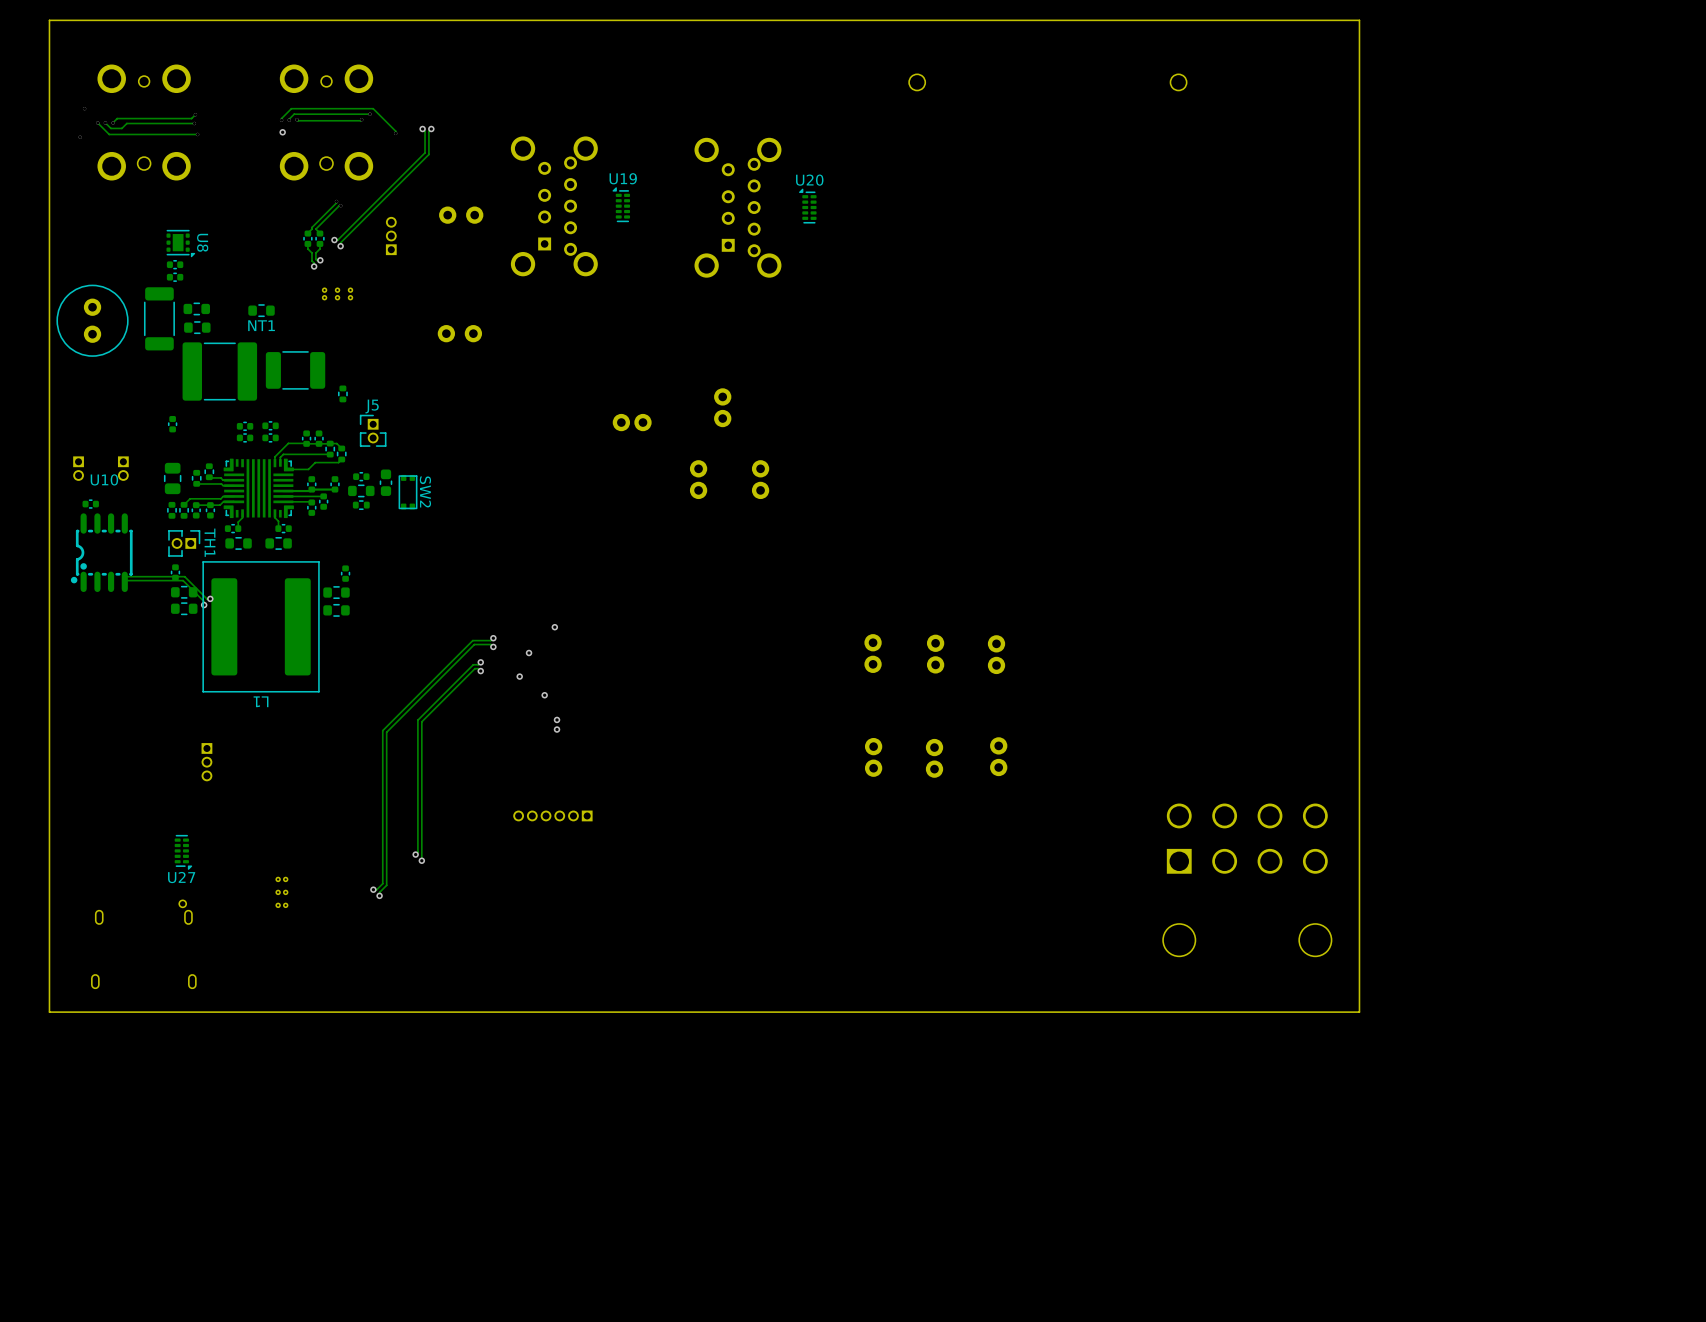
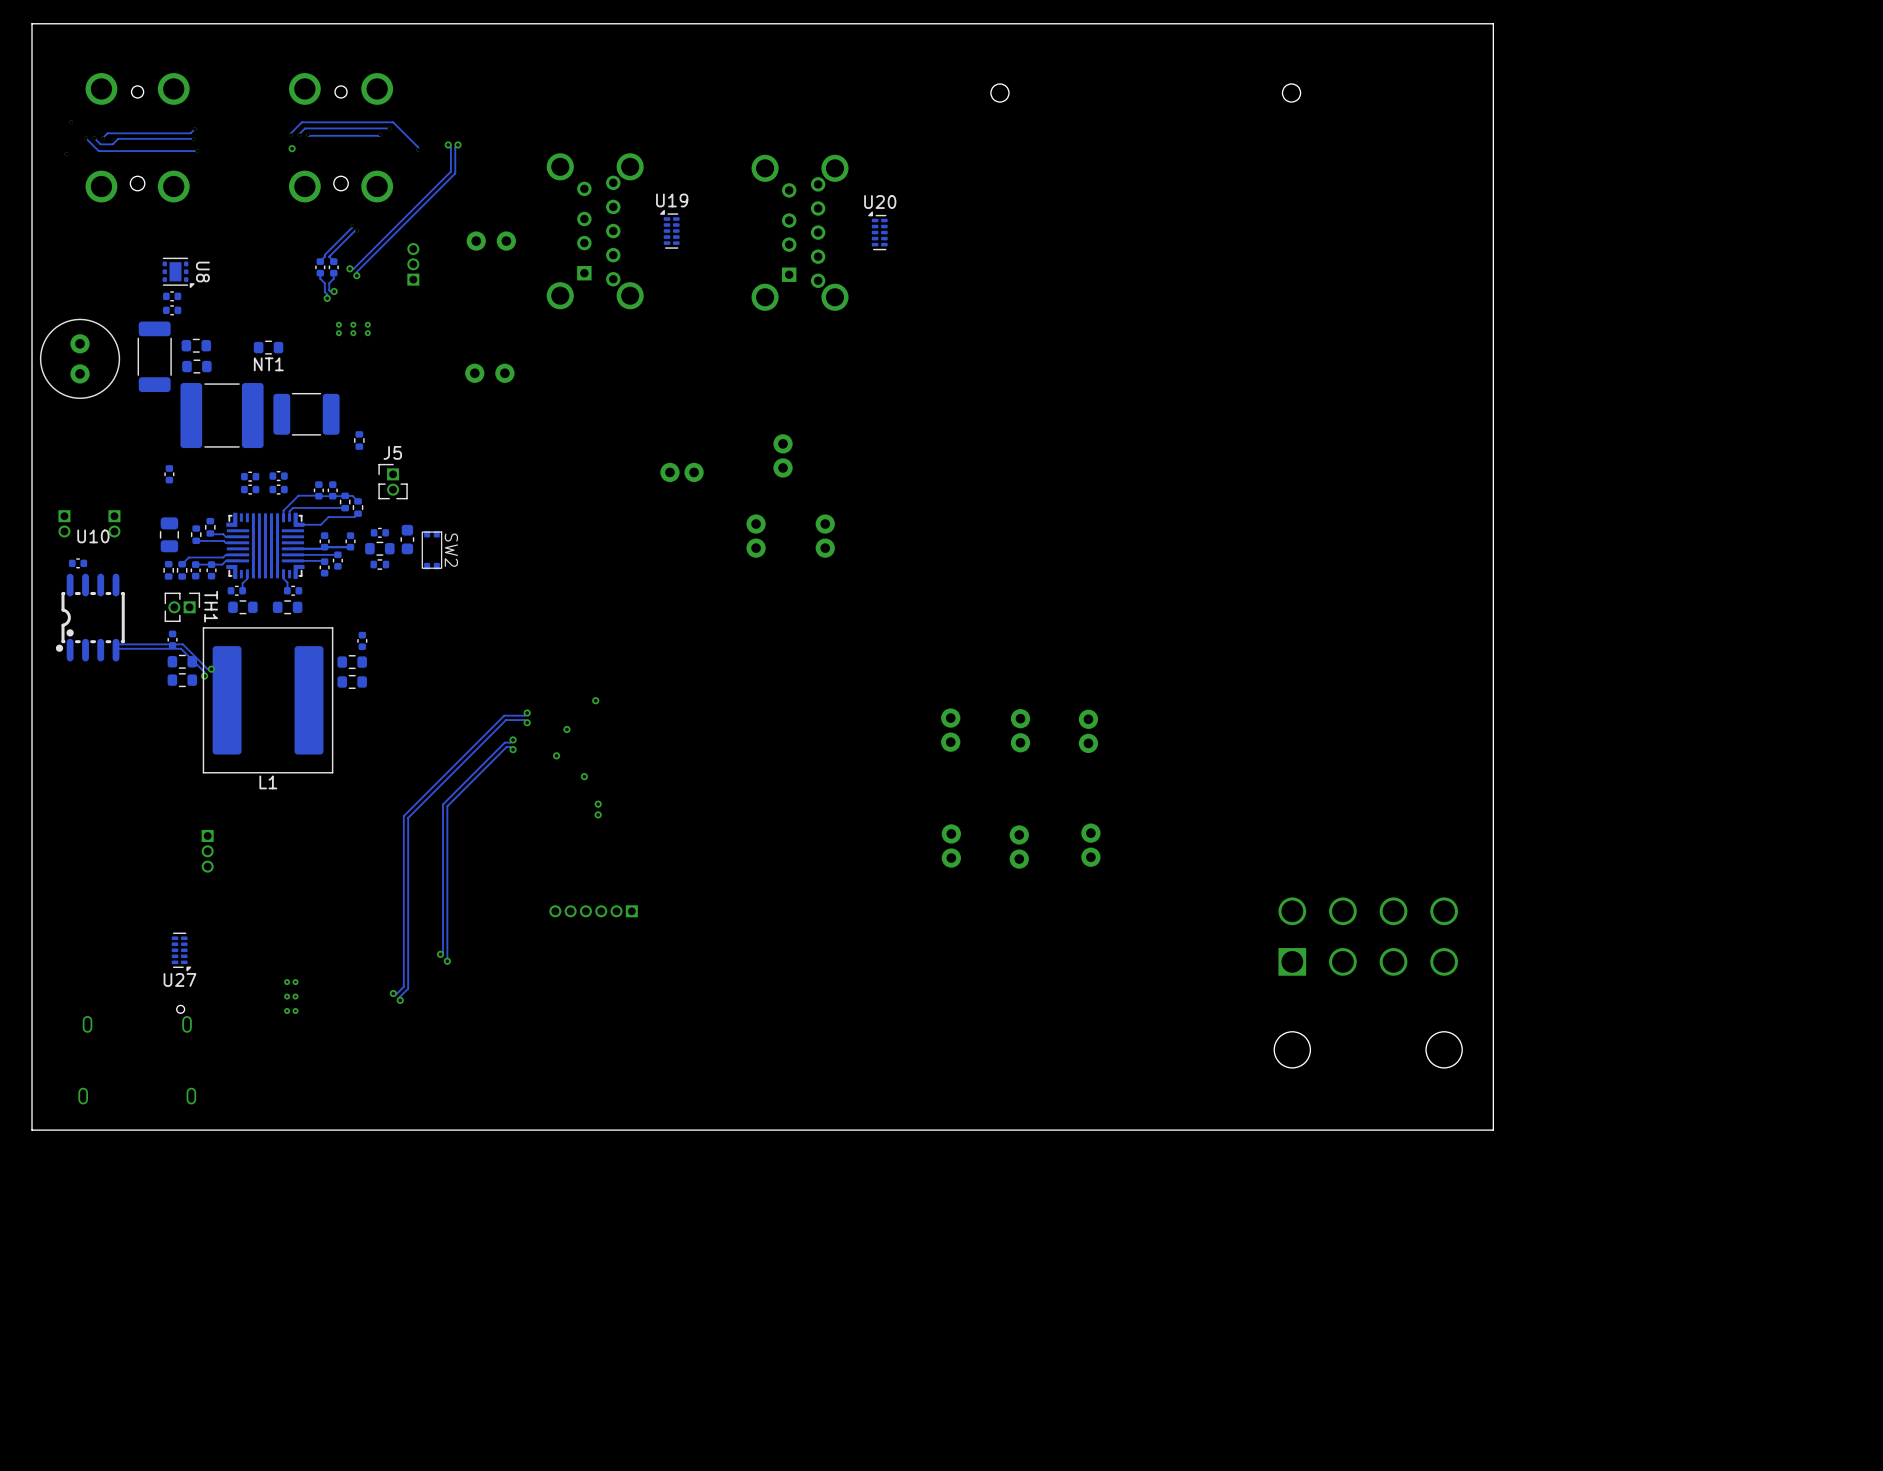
L1 name rotation: 0° (261, 701) -> 180° (268, 782)

